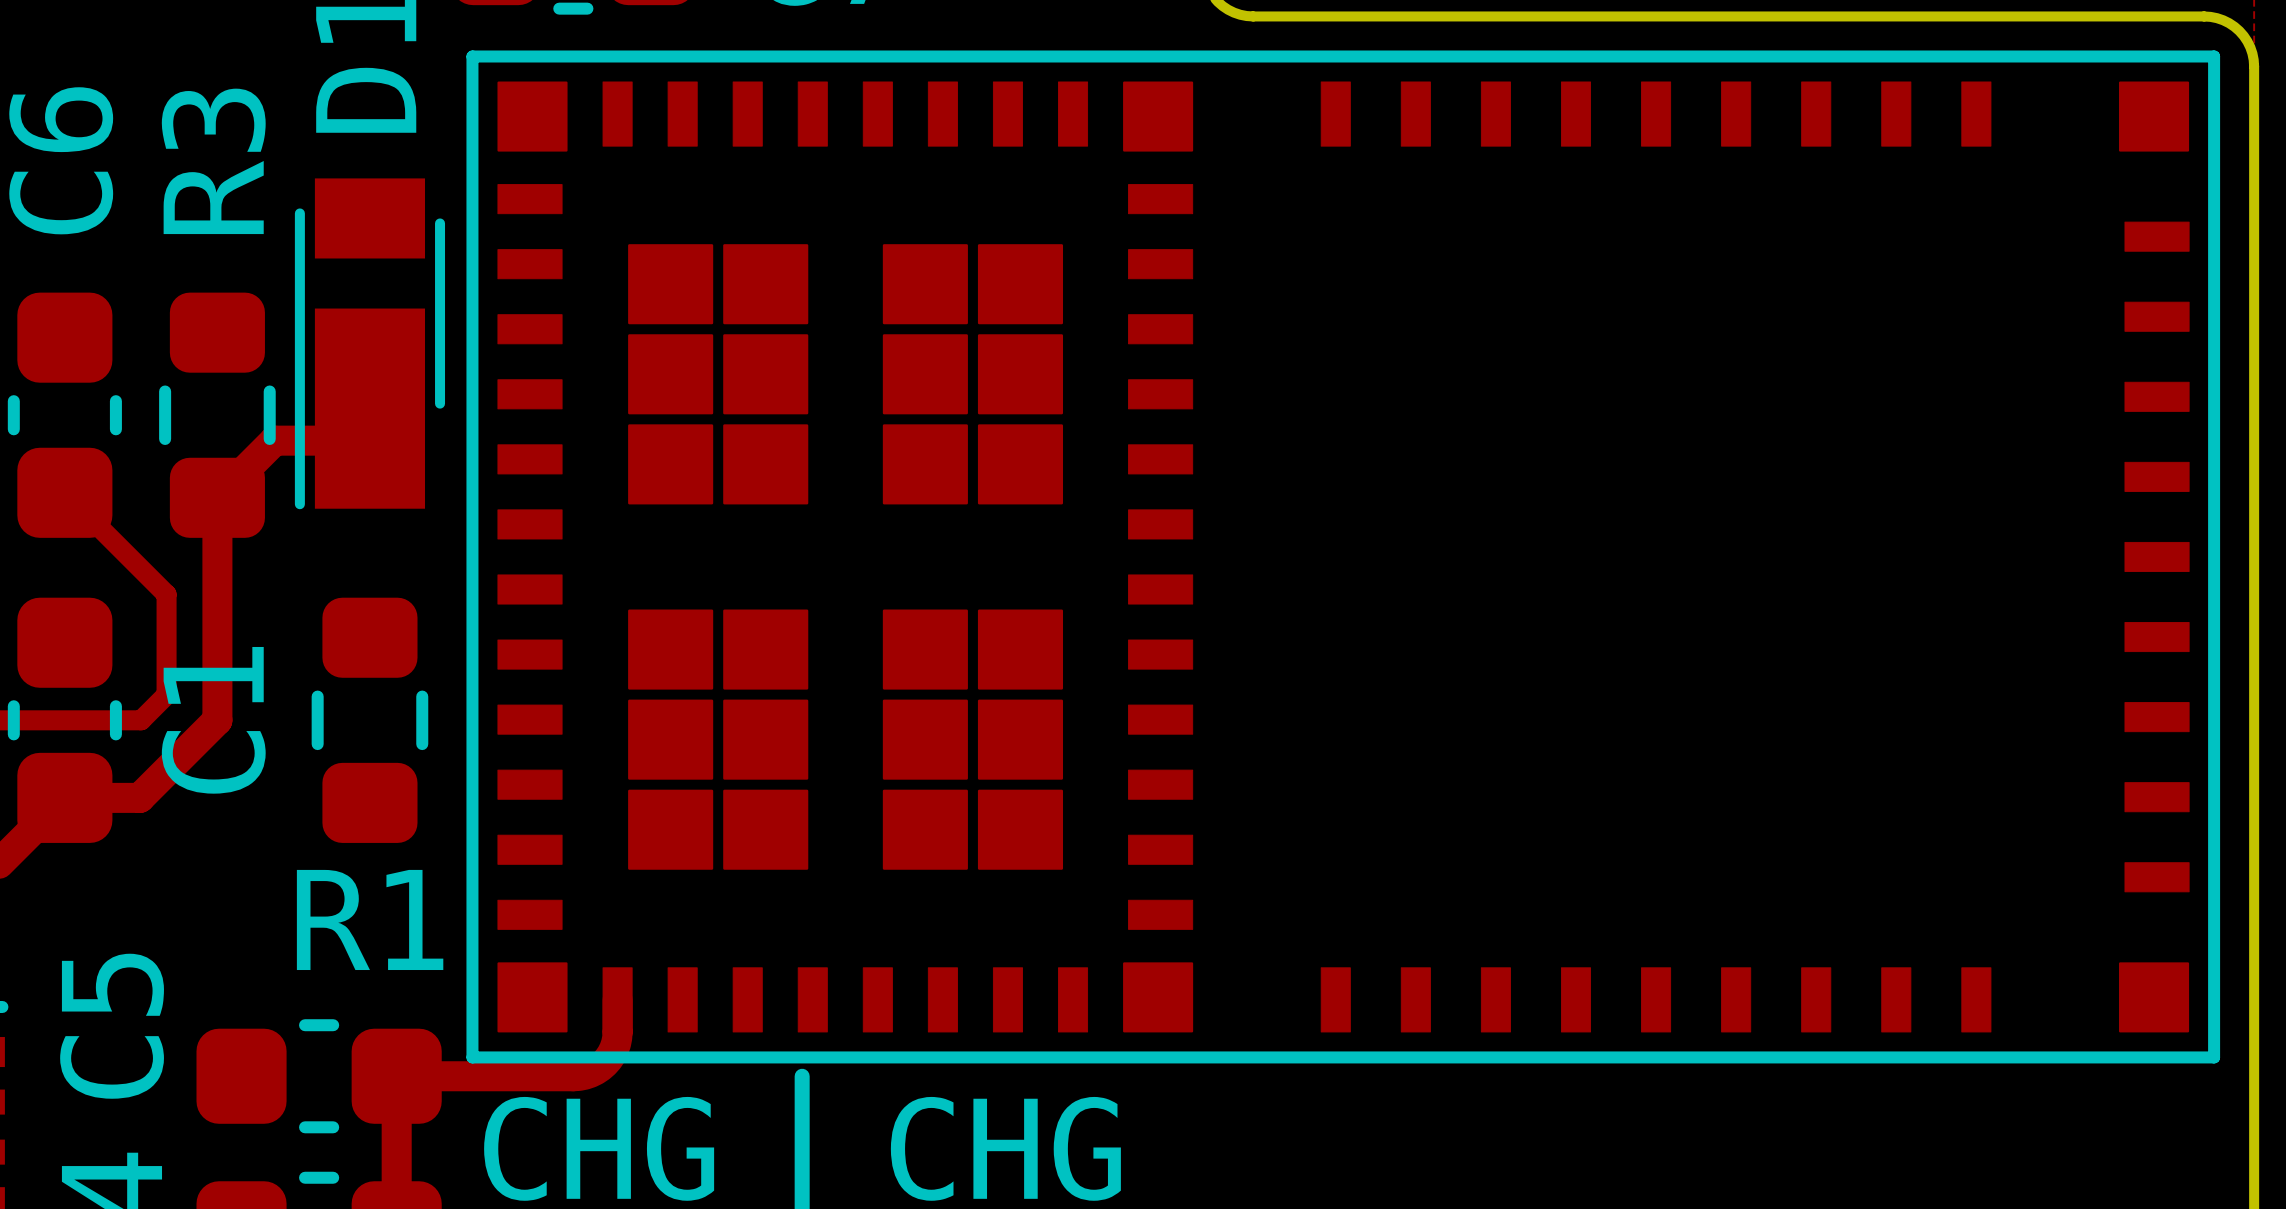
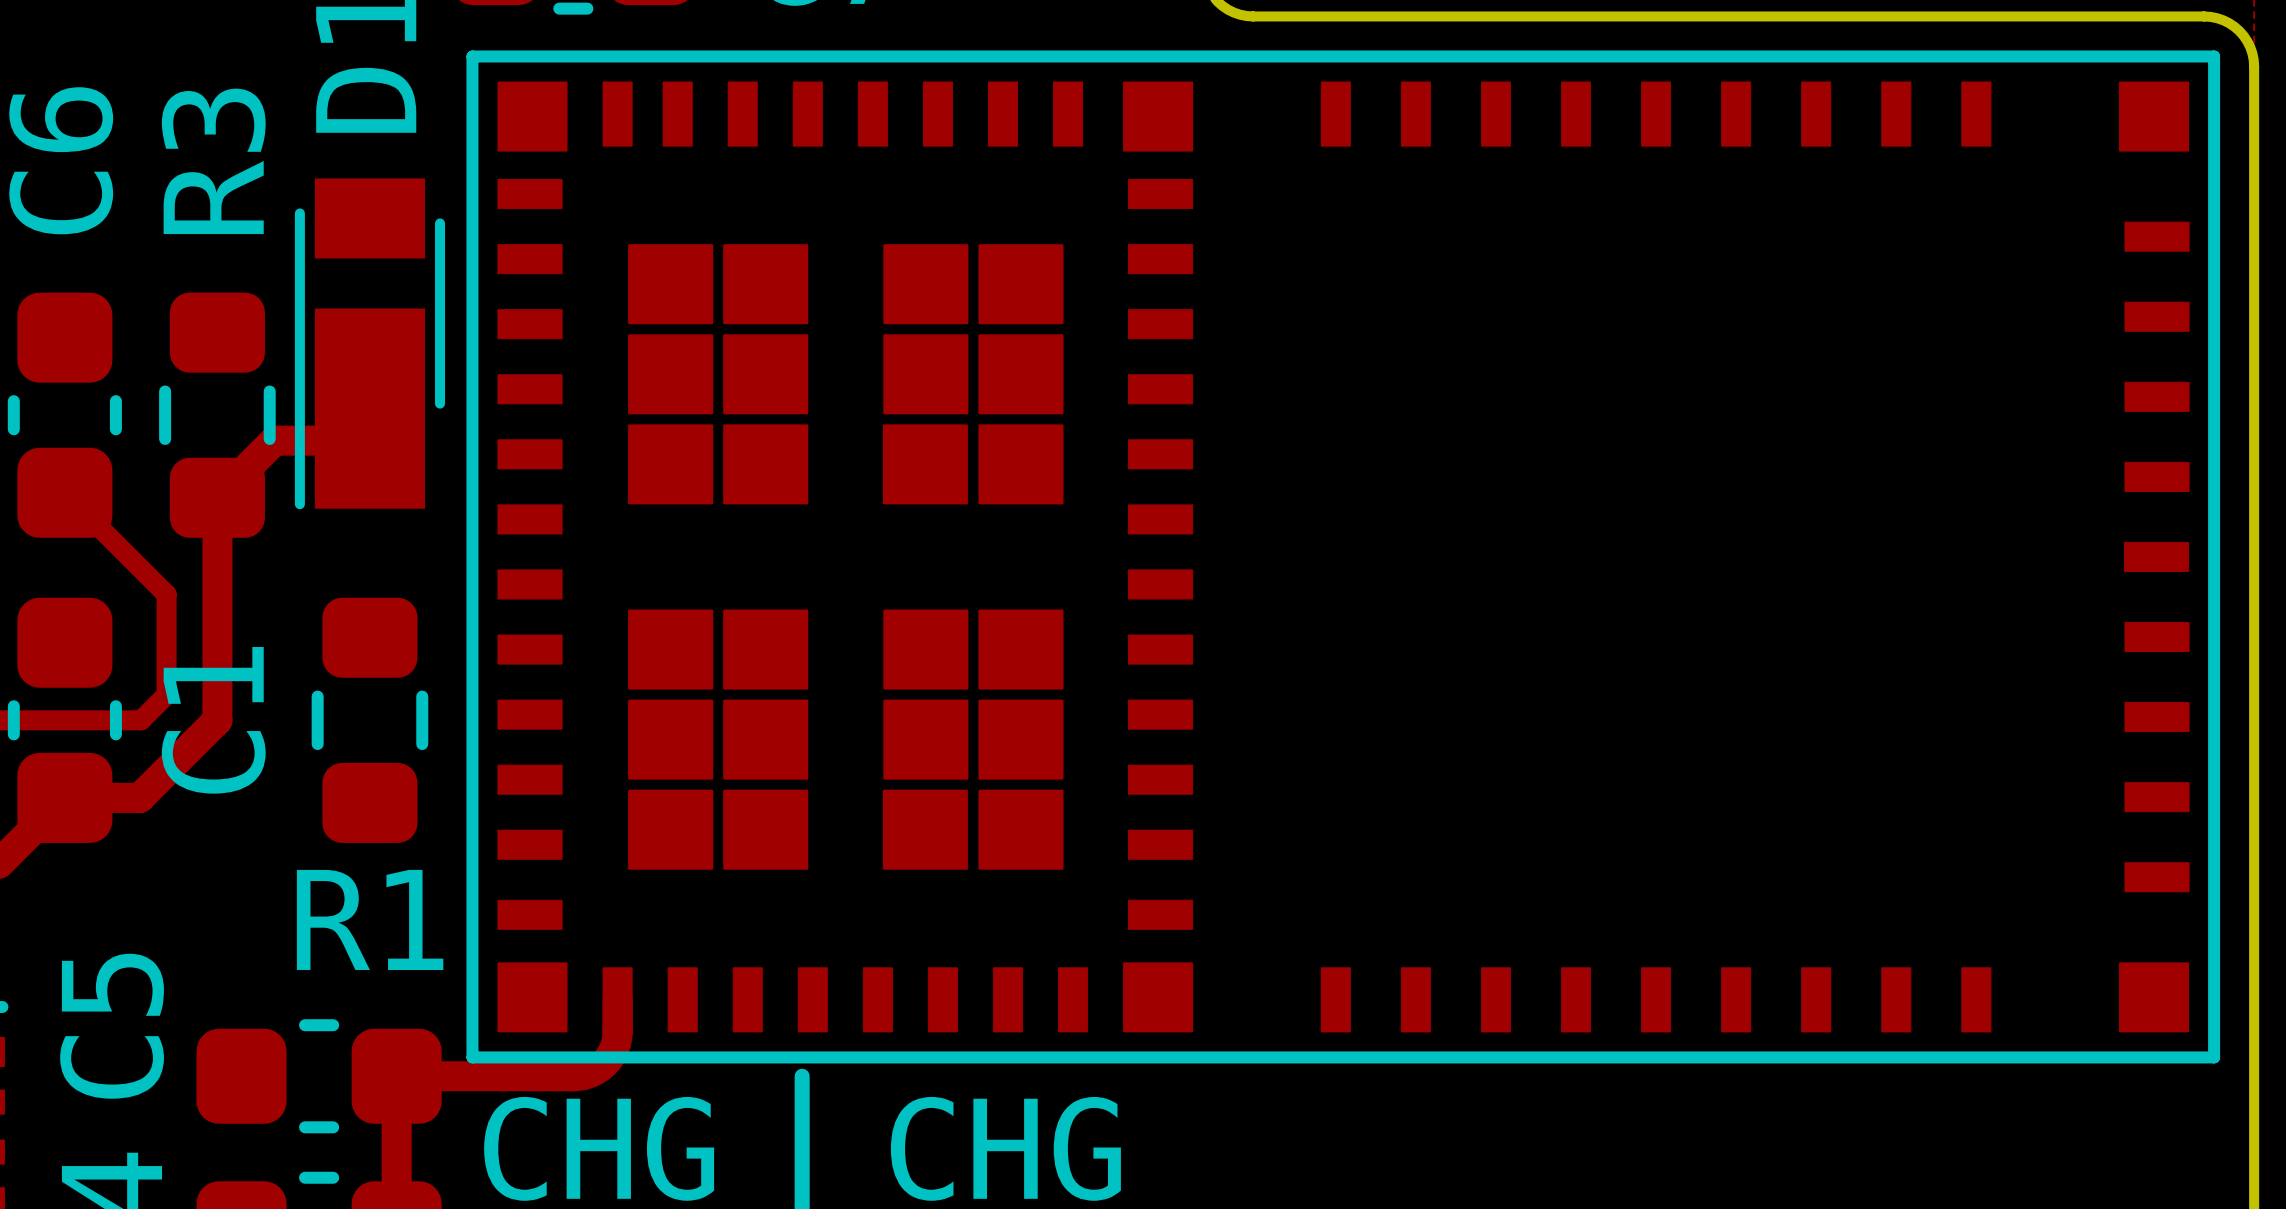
part footprint: [466, 50, 2221, 1064] -> [466, 50, 2221, 1064]

